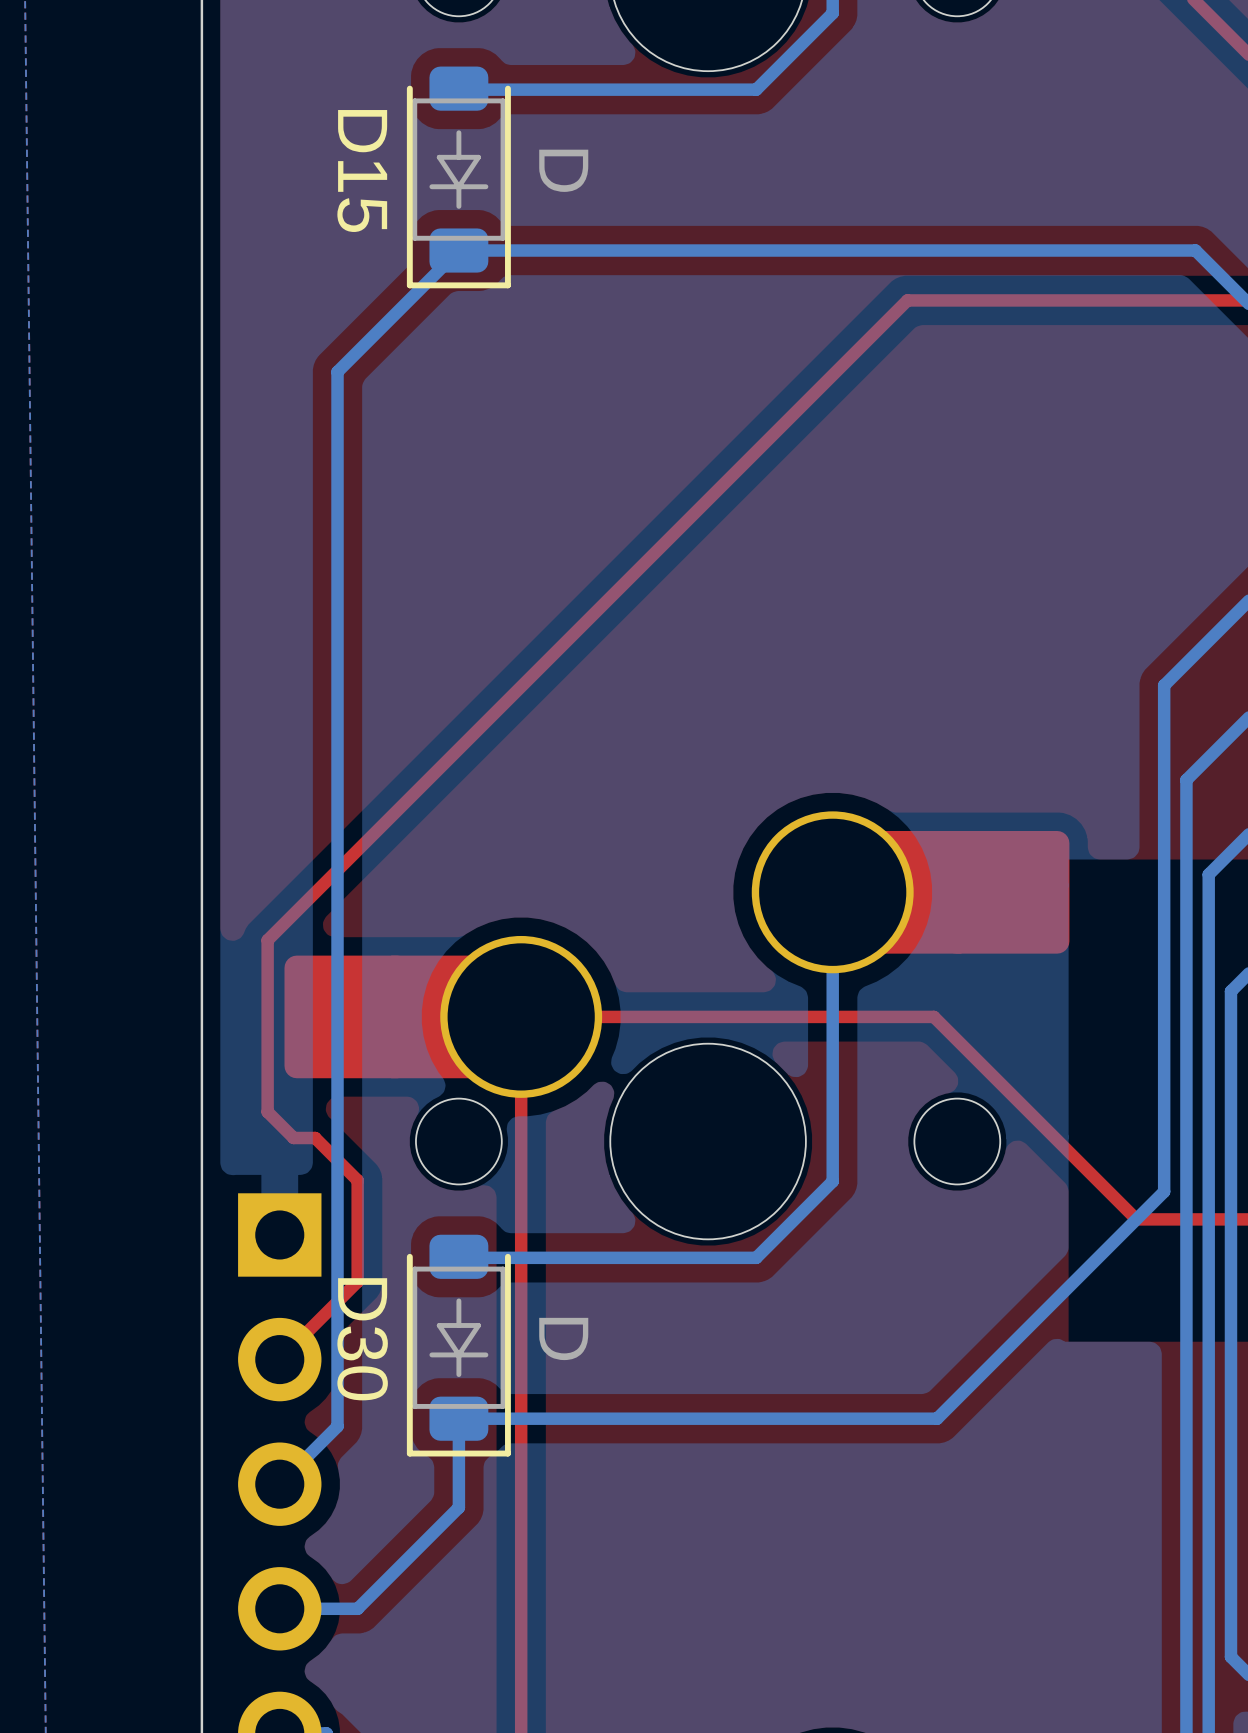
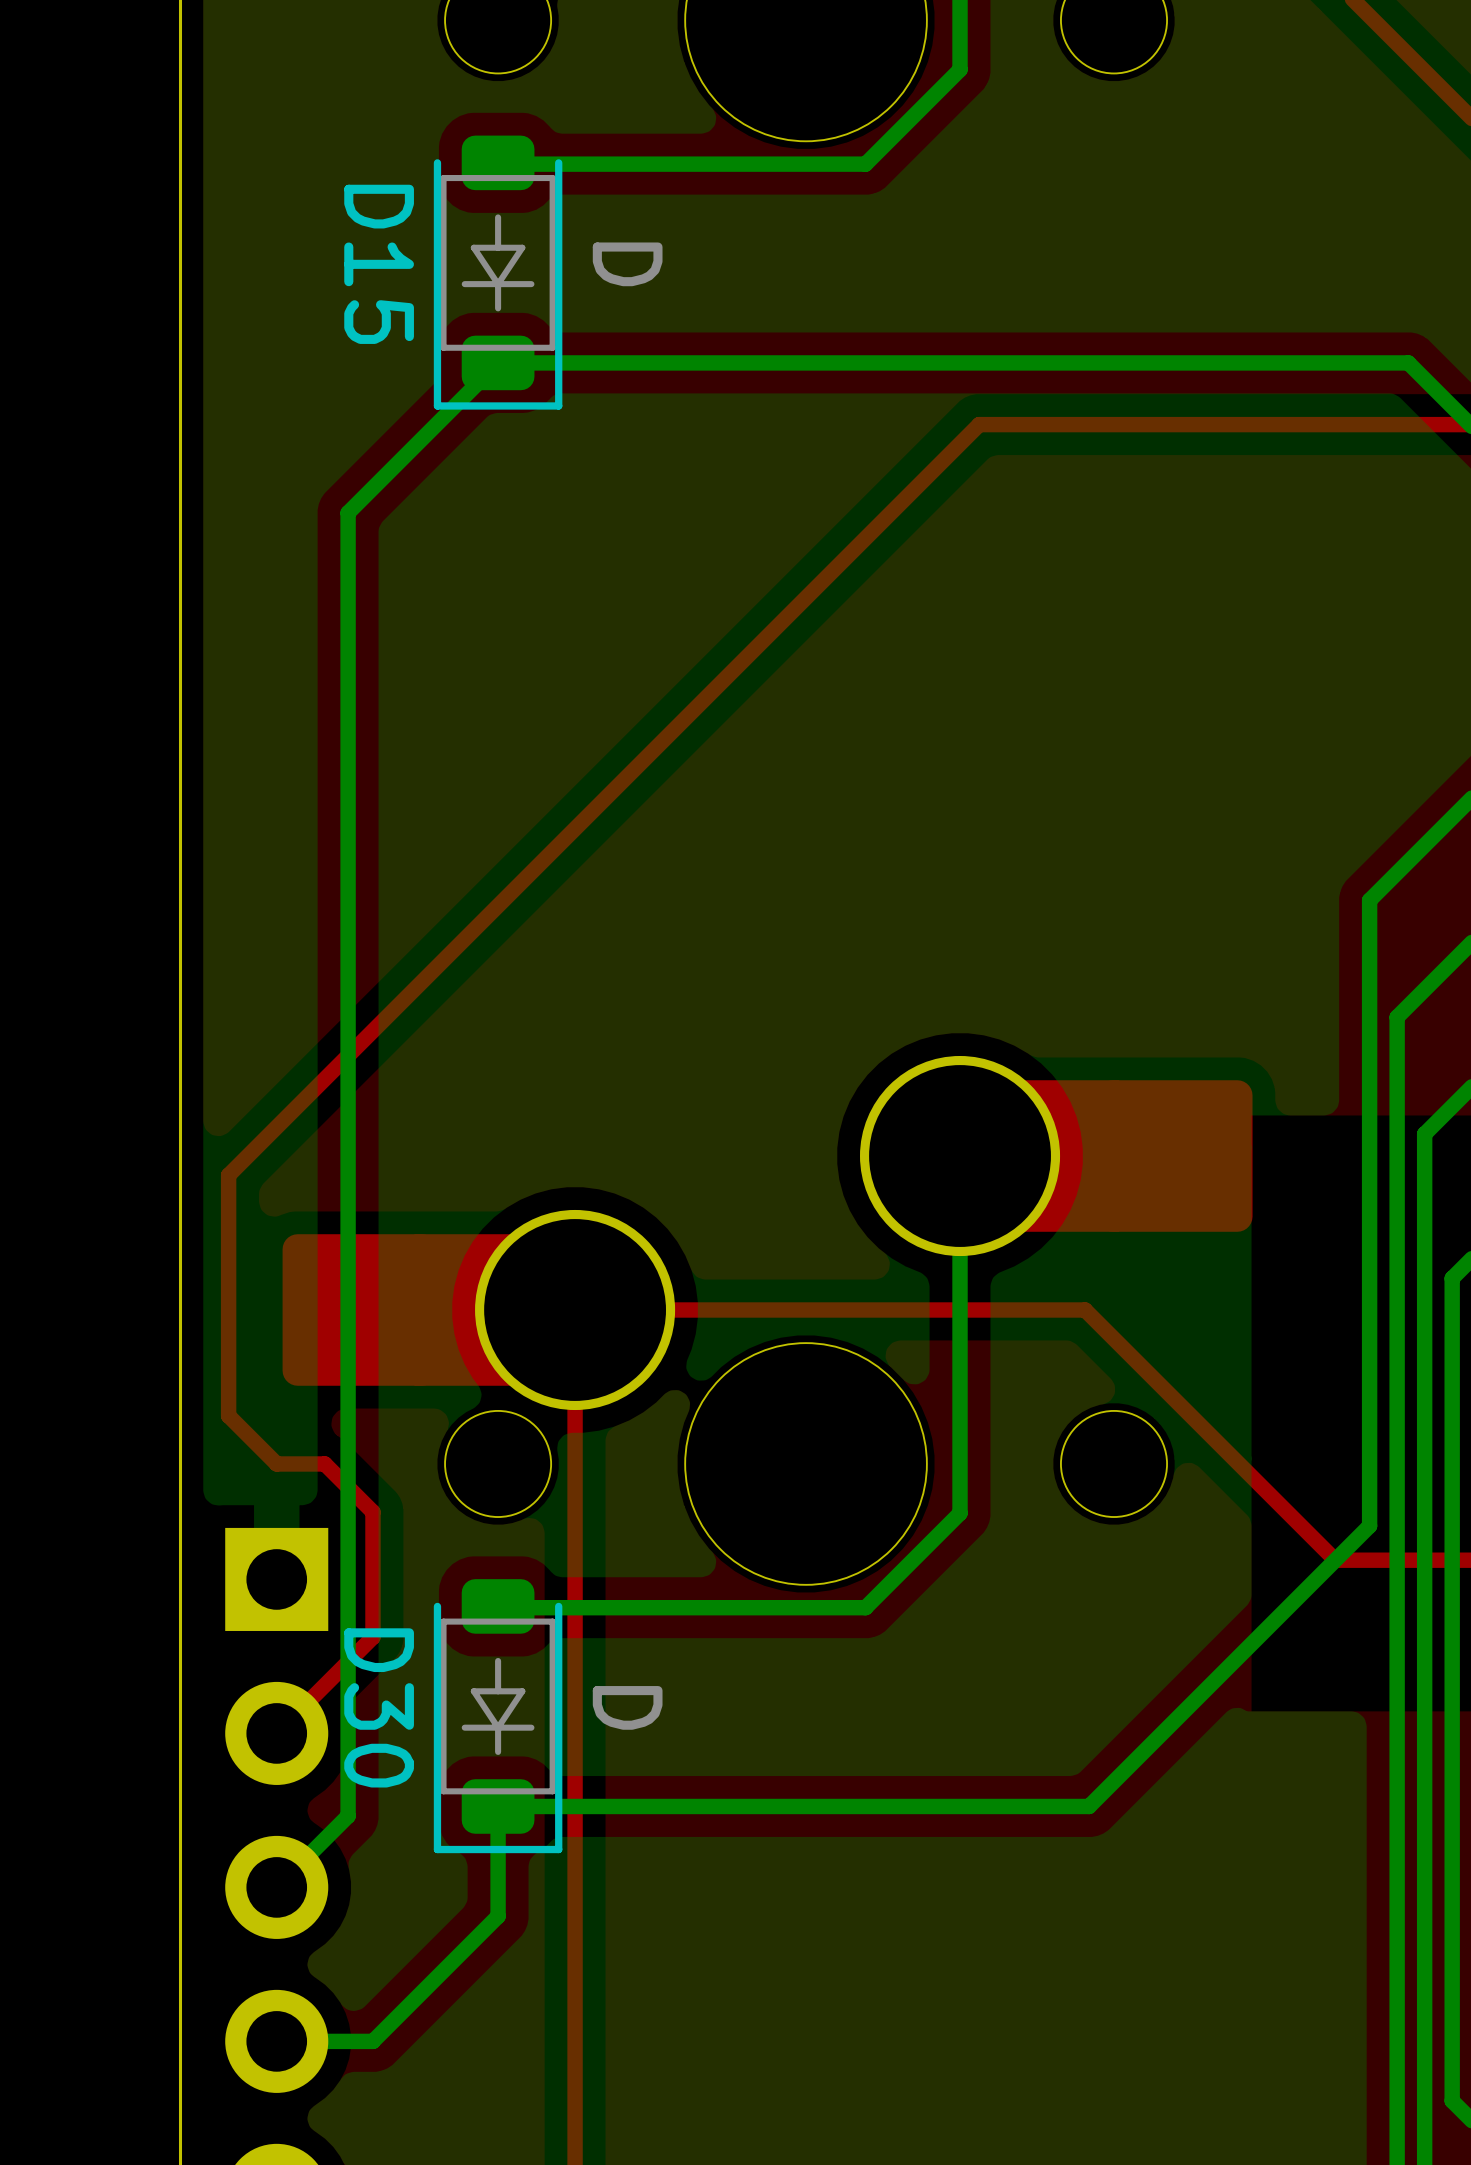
top track: (907, 300) (267, 940) (267, 1111) (293, 1138) (315, 1138) (318, 1141) -> (1052, 424) (979, 424) (228, 1175) (228, 1415) (276, 1463) (324, 1463)

